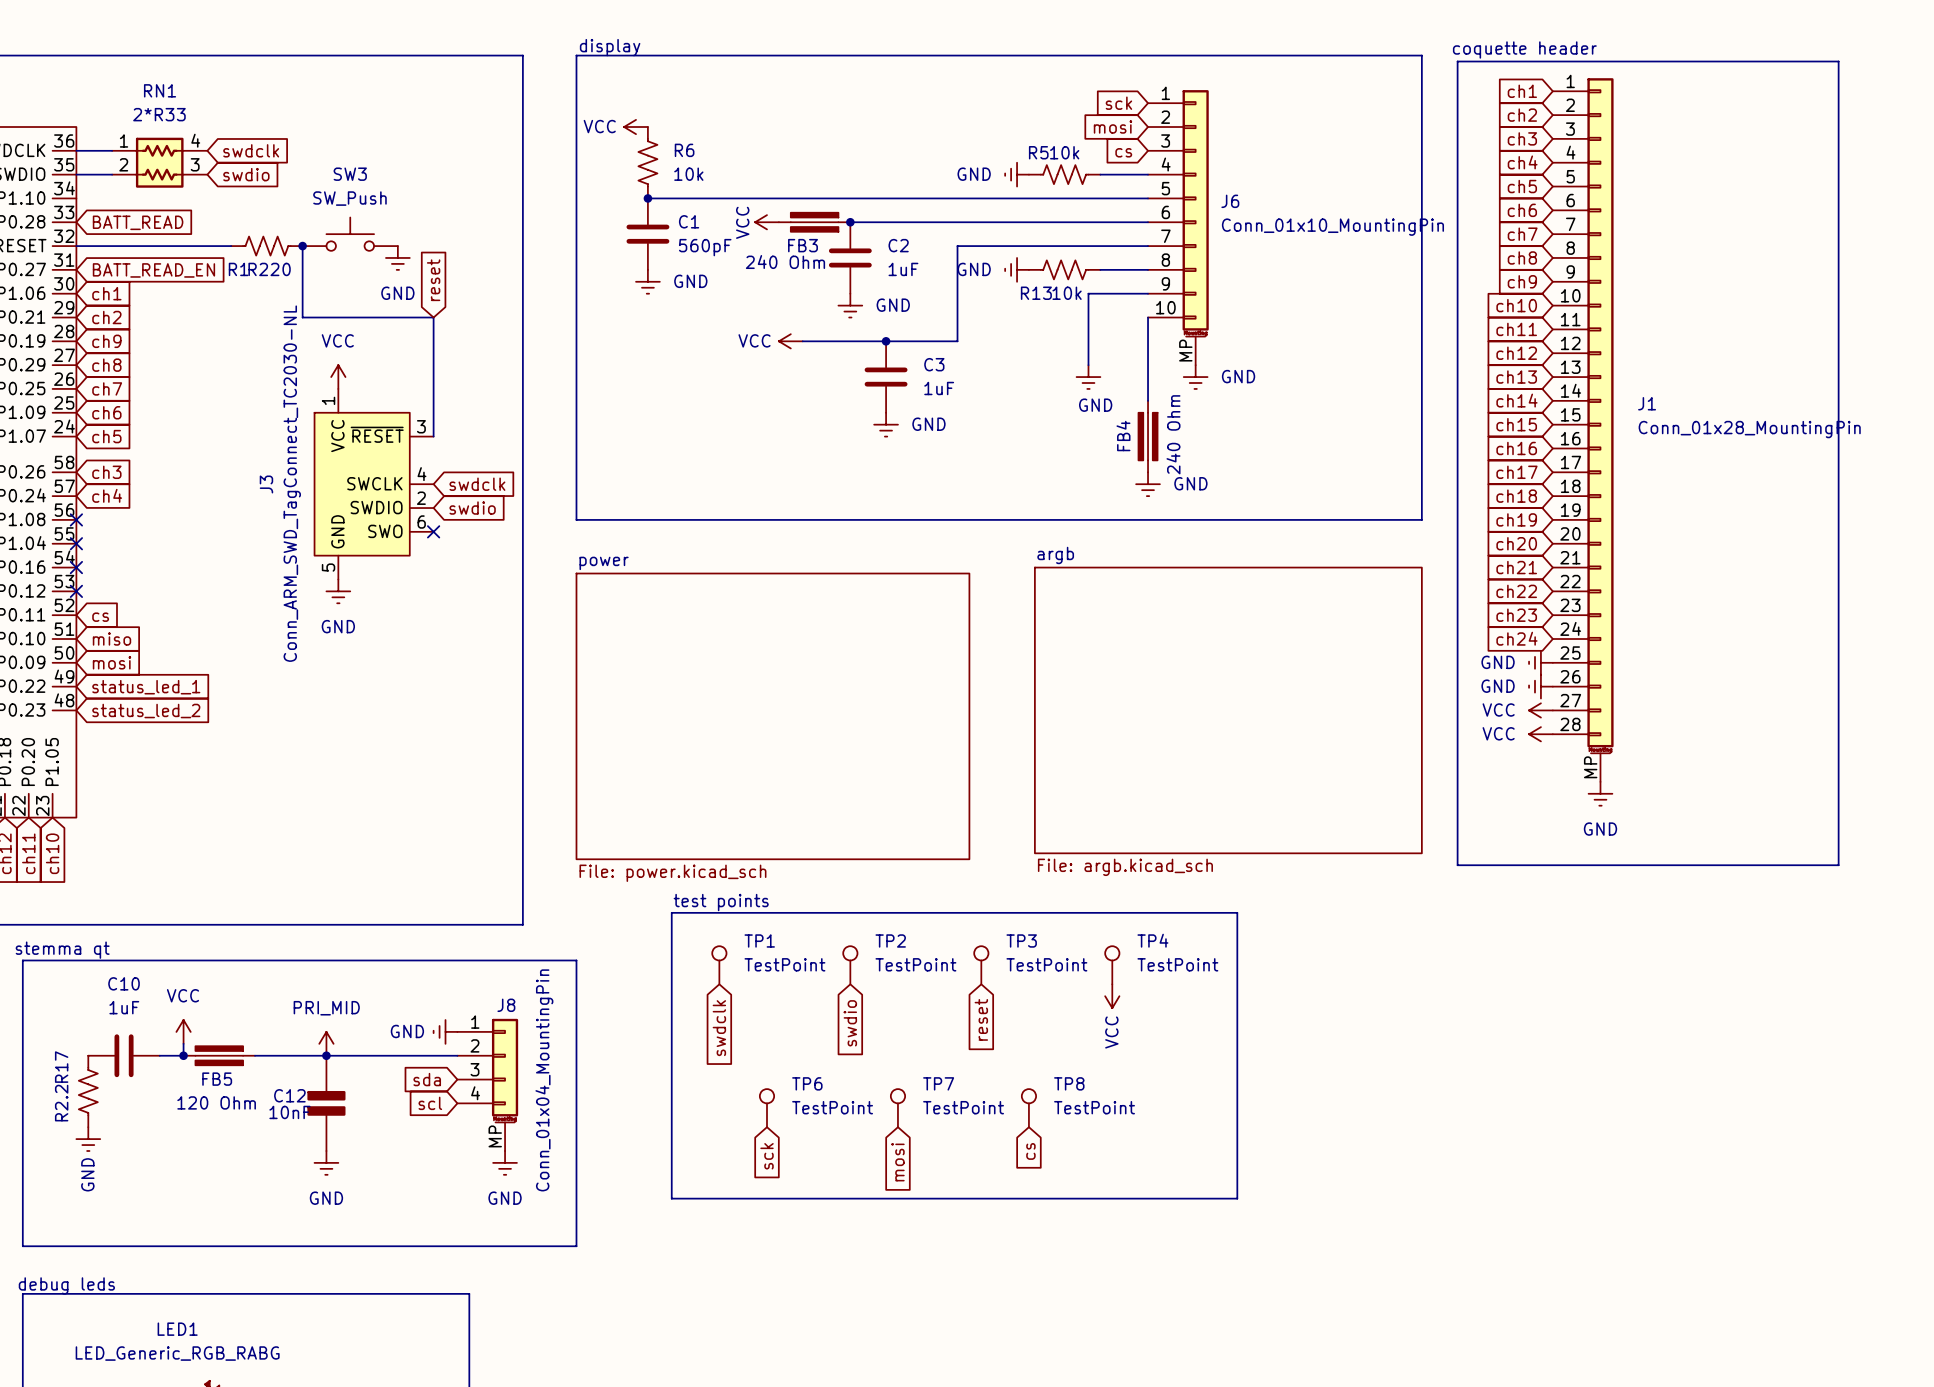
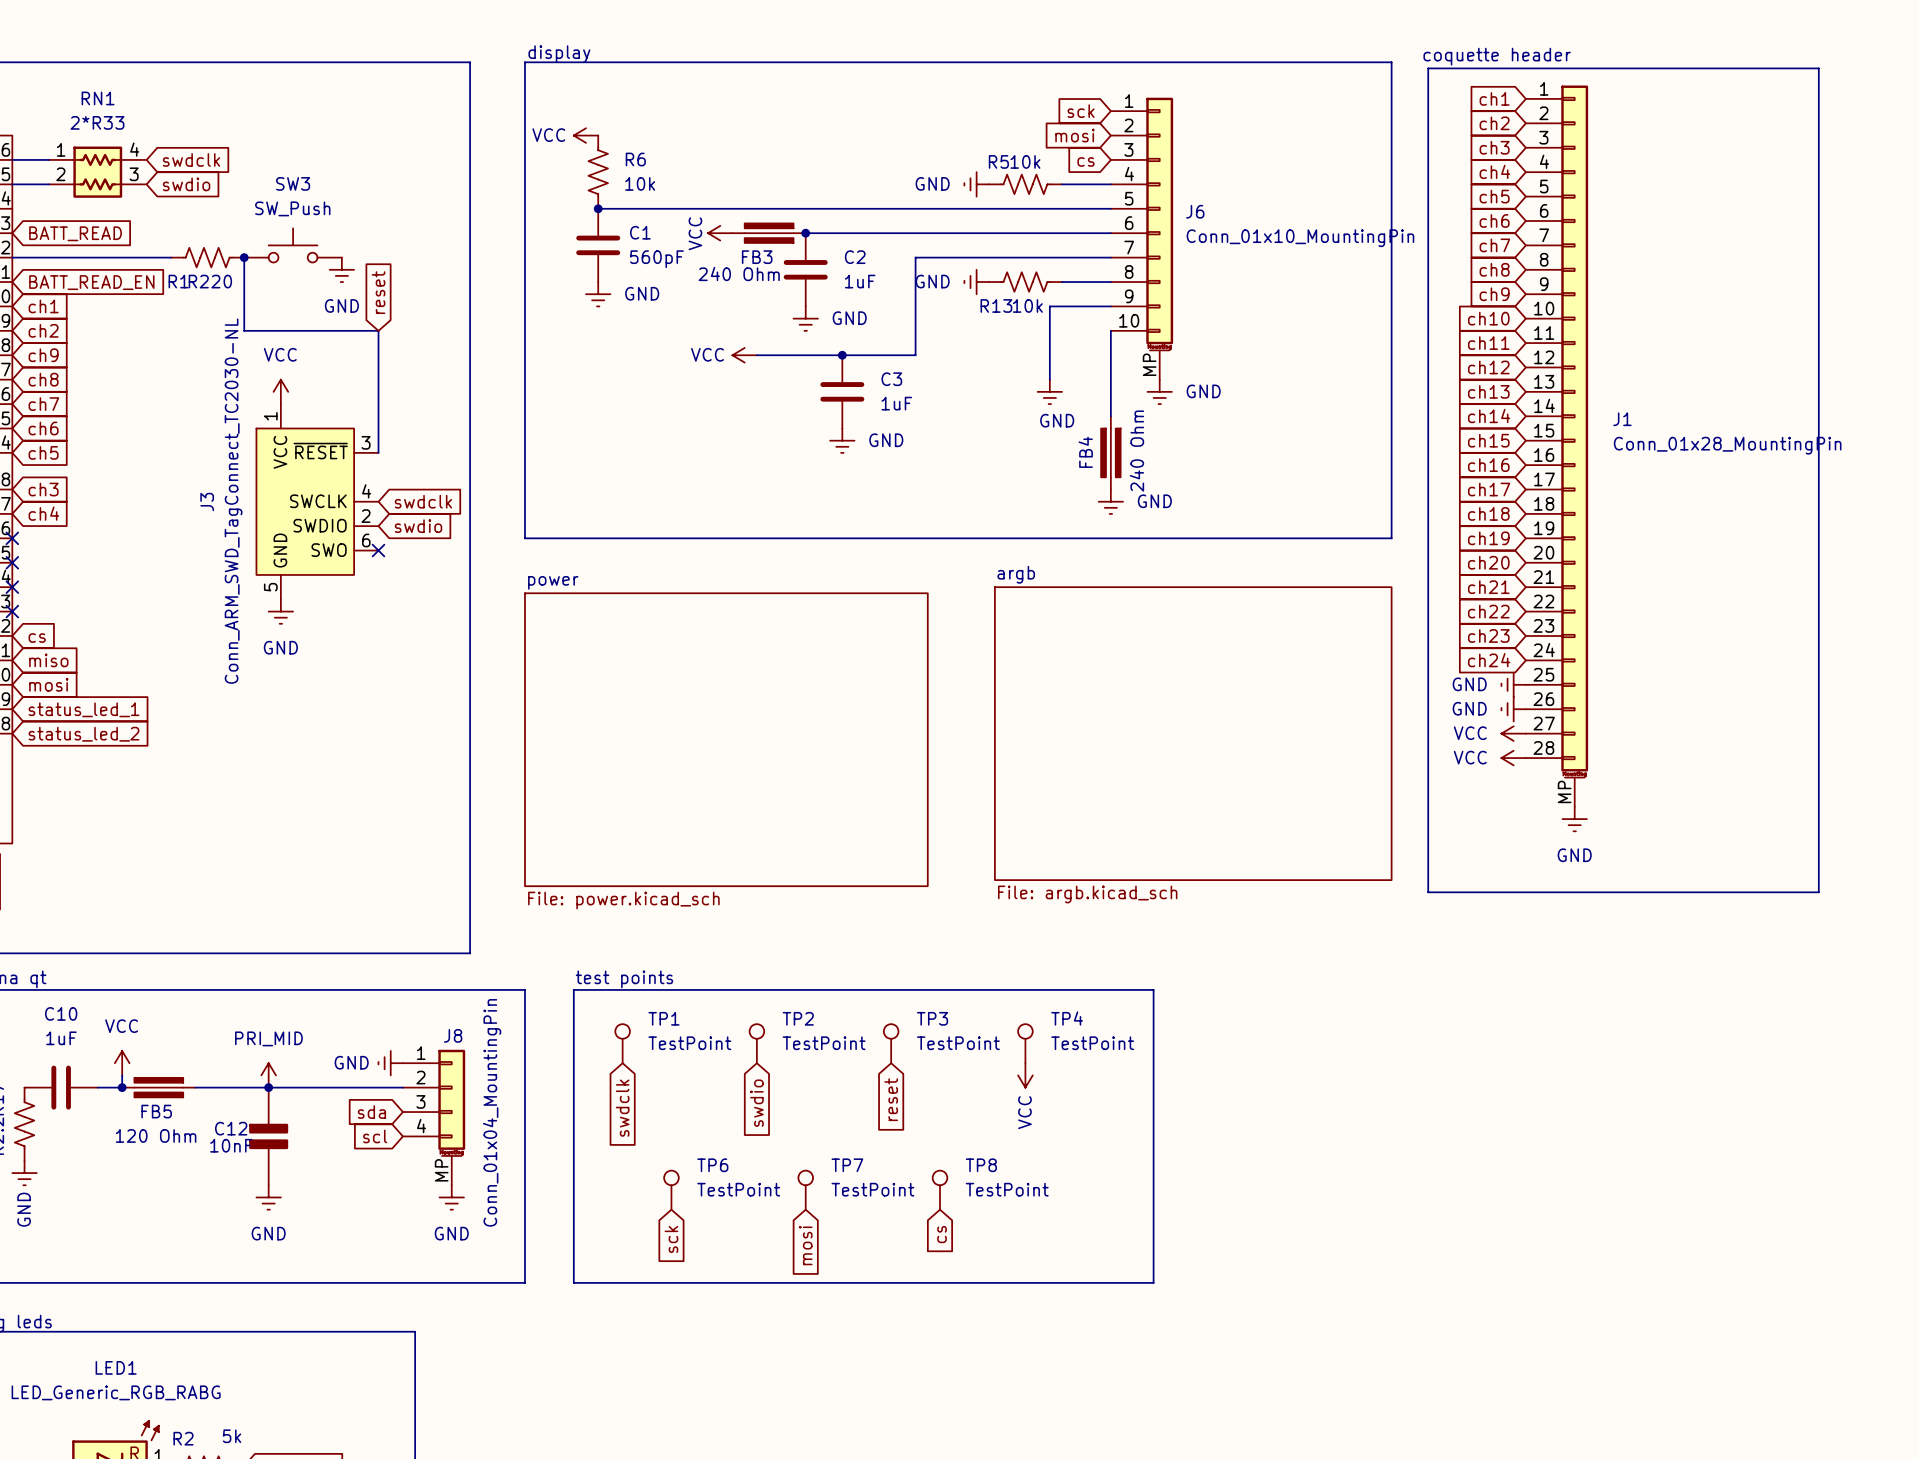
text position: test points (721, 902) -> test points (624, 979)
line: (671, 912) (1237, 912) (1237, 1198) (671, 1198) (671, 912) -> (573, 989) (1153, 989) (1153, 1282) (573, 1282) (573, 989)
TP1 position: (719, 965) -> (622, 1043)
TP2 position: (850, 965) -> (756, 1043)
TP3 position: (981, 965) -> (891, 1043)
TP4 position: (1112, 965) -> (1025, 1043)
power symbol position: VCC (1112, 996) -> VCC (1025, 1075)
global label position: reset (981, 1019) -> reset (891, 1099)
global label position: swdio (850, 1023) -> swdio (756, 1103)
global label position: swdclk (719, 1028) -> swdclk (622, 1108)
TP6 position: (767, 1108) -> (671, 1190)
TP7 position: (897, 1108) -> (805, 1190)
TP8 position: (1028, 1108) -> (939, 1190)
global label position: cs (1030, 1151) -> cs (942, 1234)
global label position: sck (767, 1156) -> sck (671, 1239)
global label position: mosi (897, 1162) -> mosi (805, 1245)

